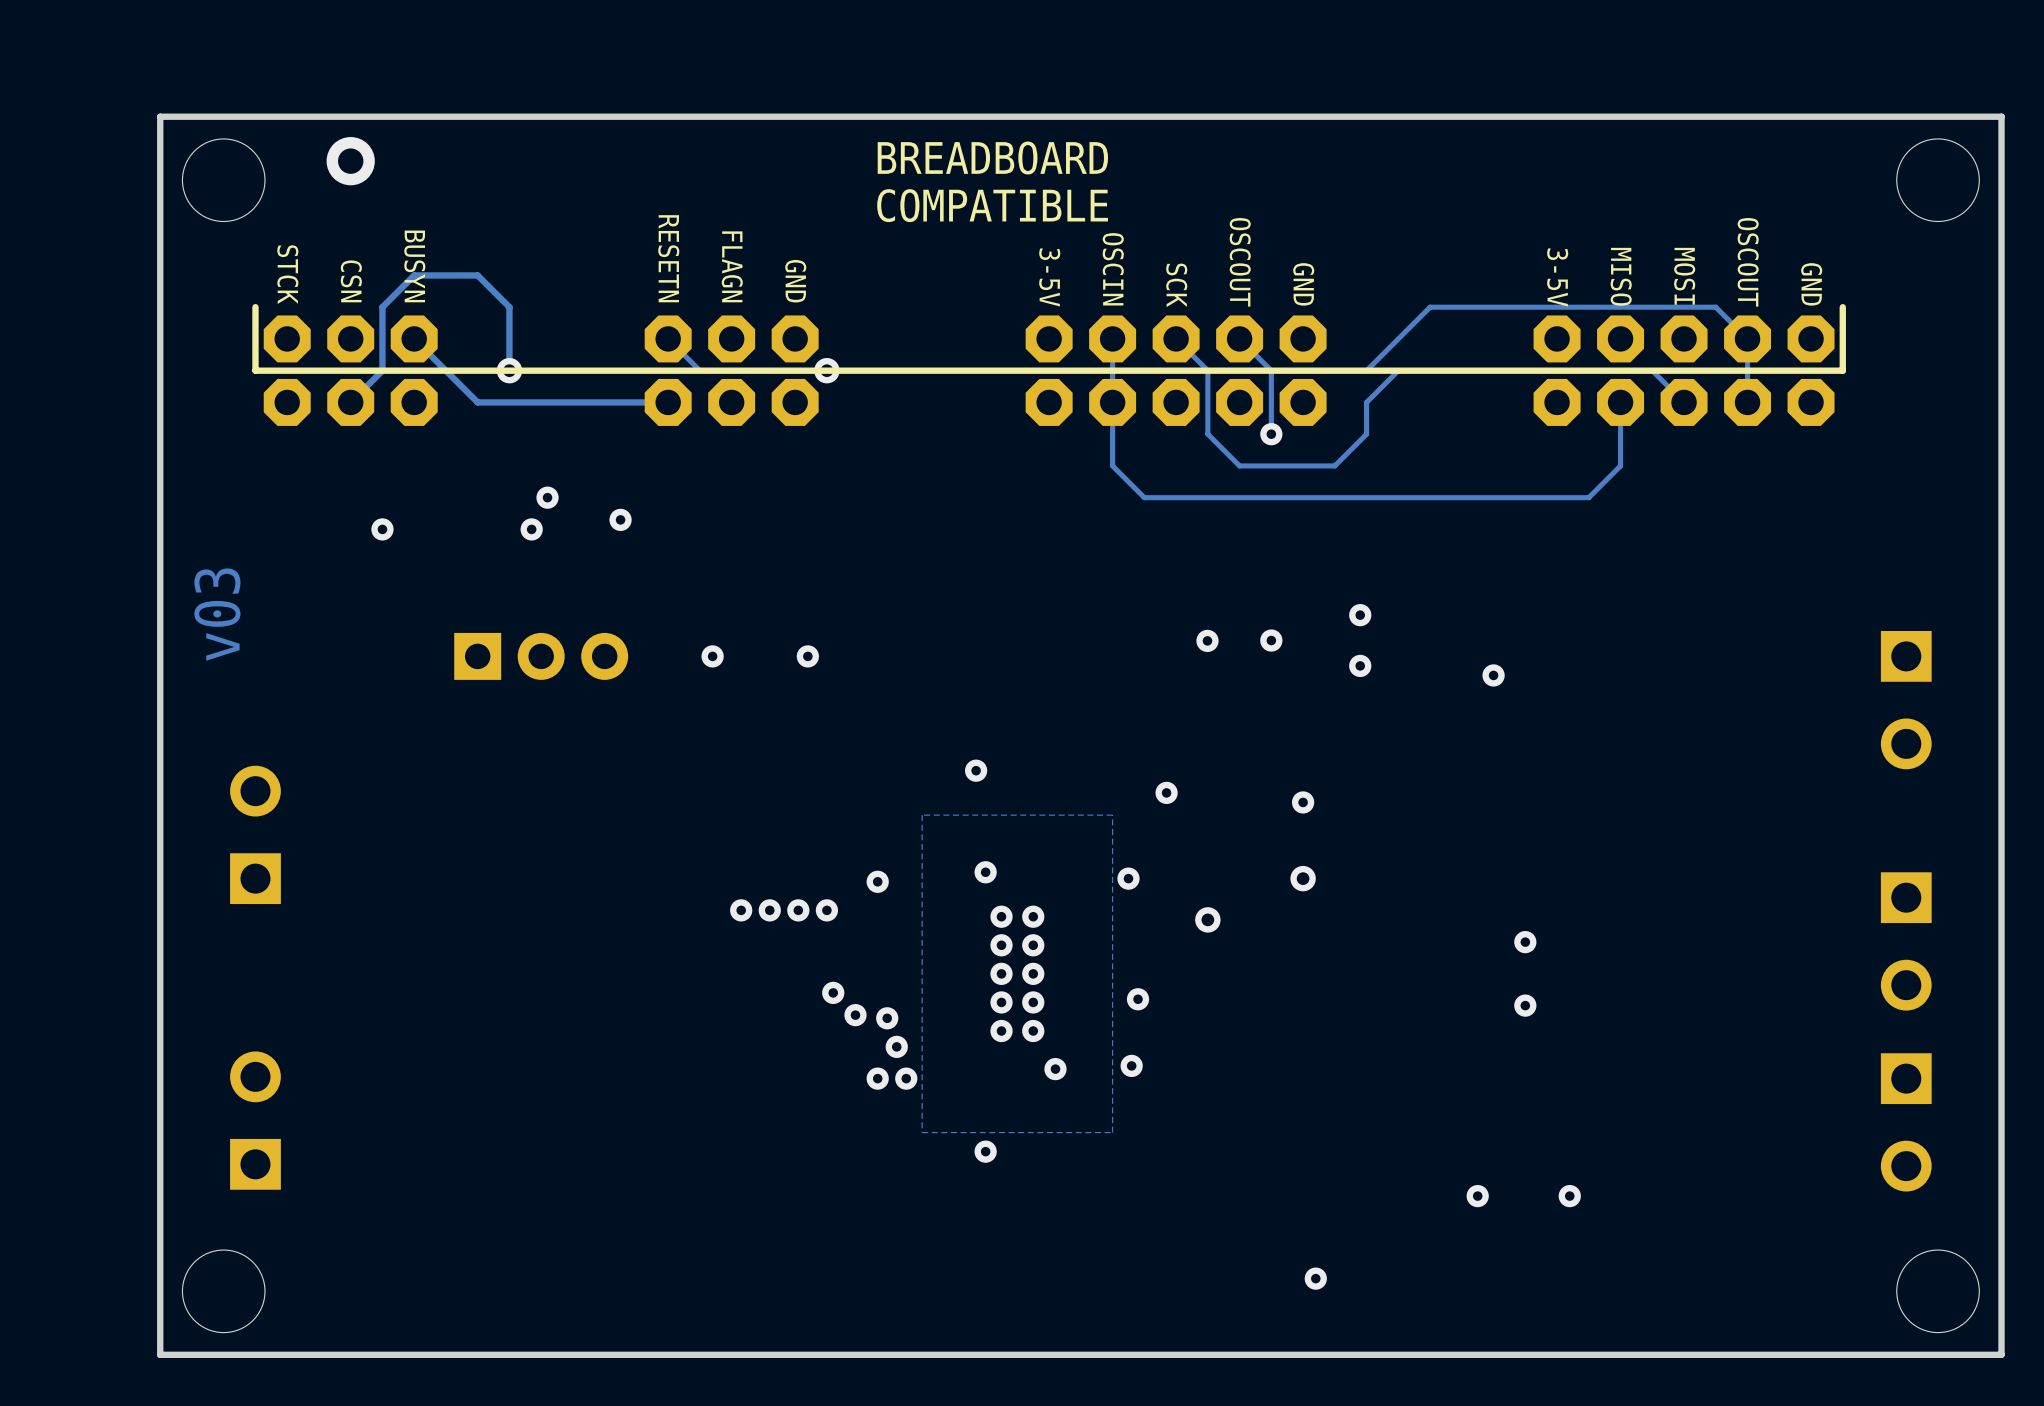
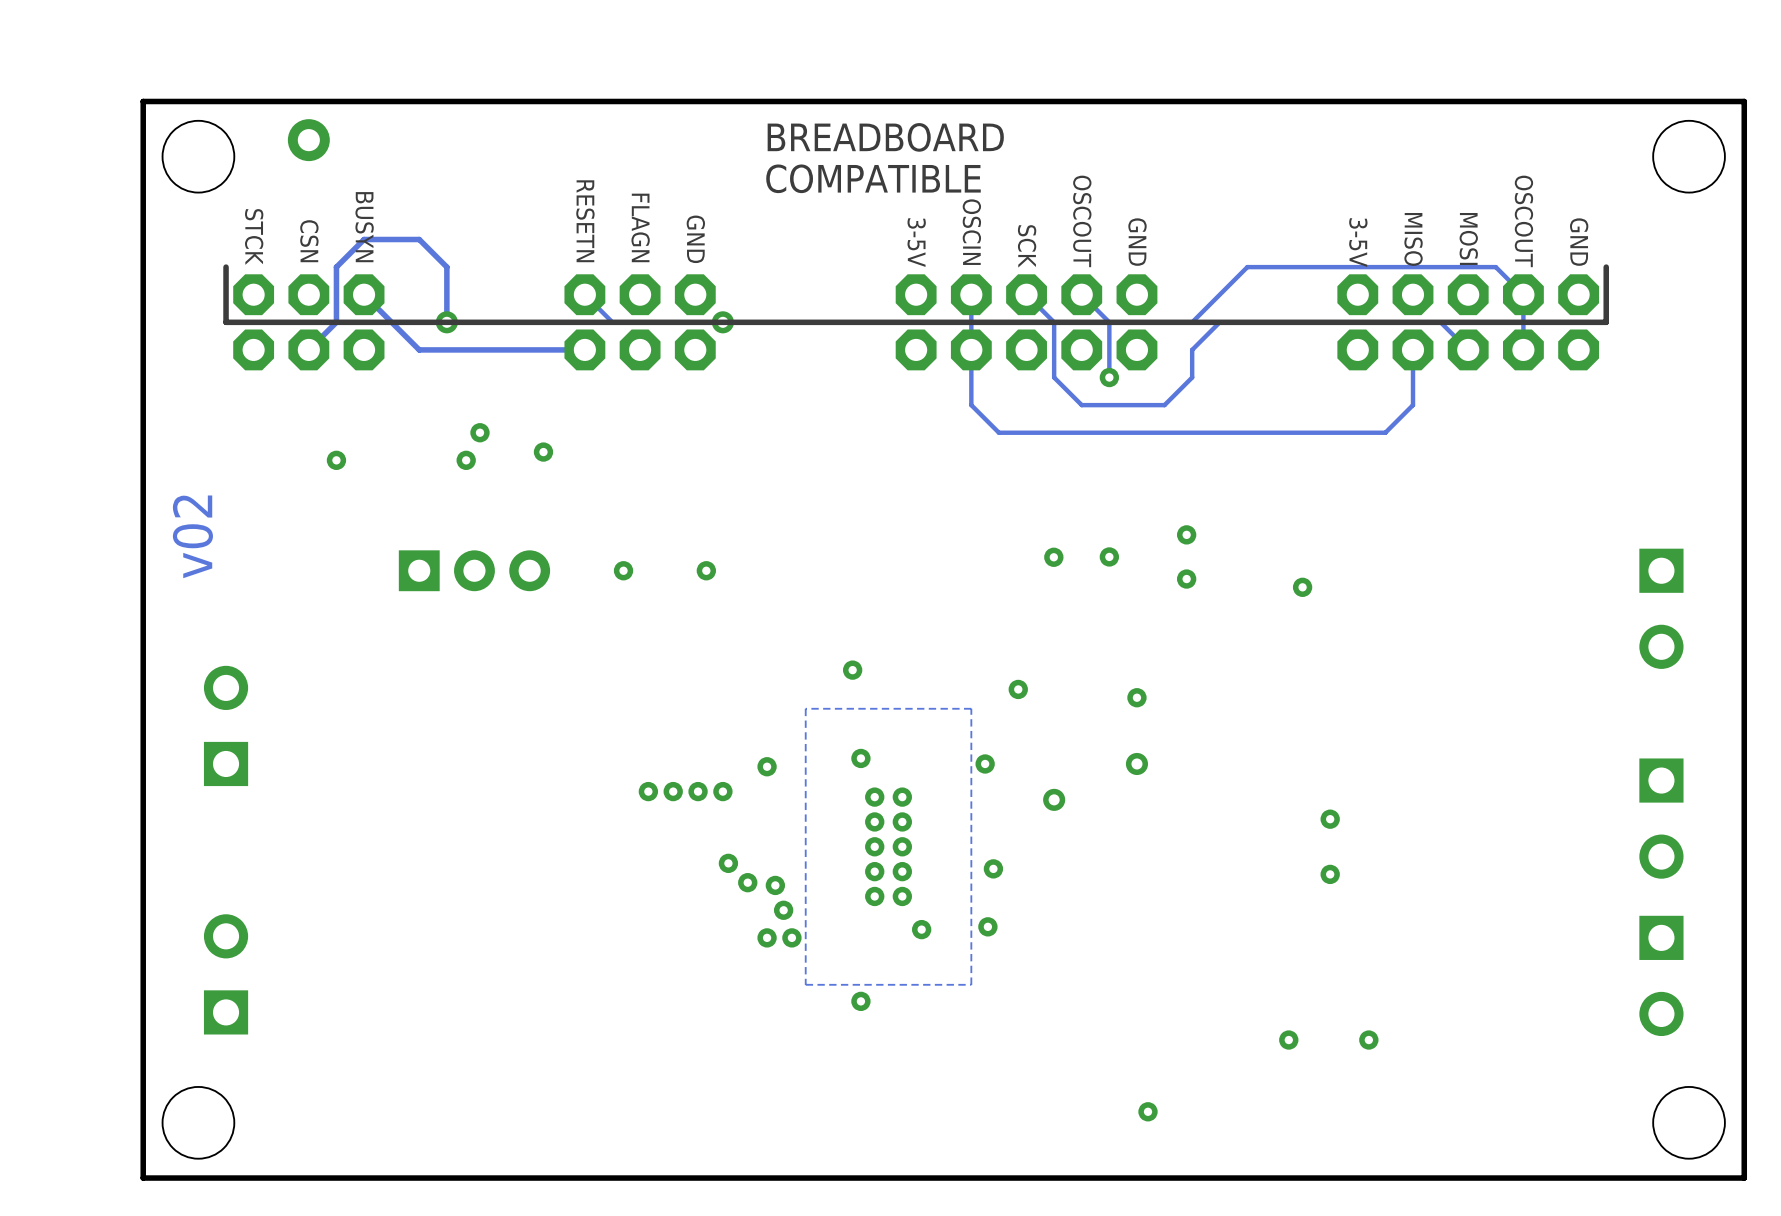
text: v03 (217, 614) -> v02 (192, 536)

